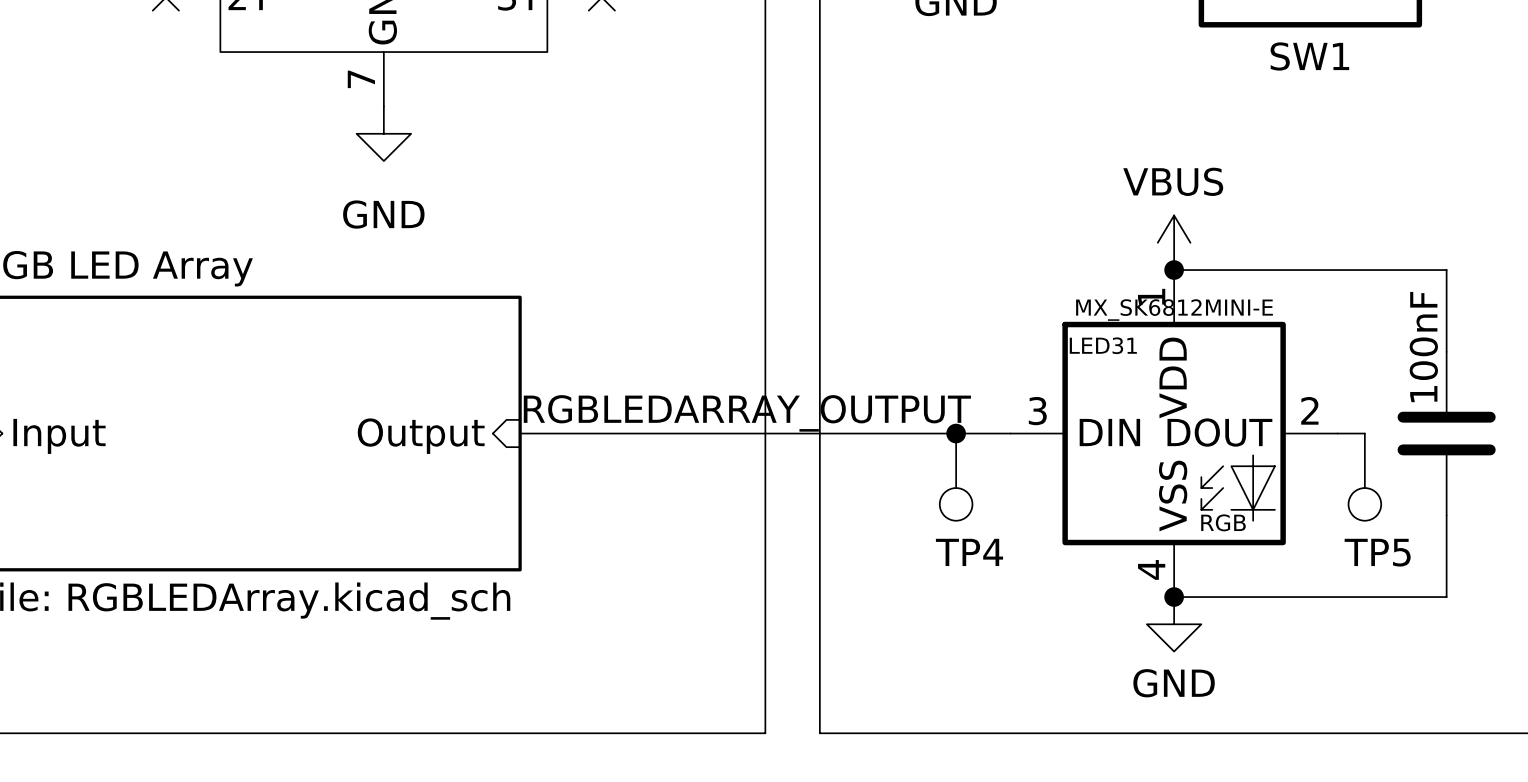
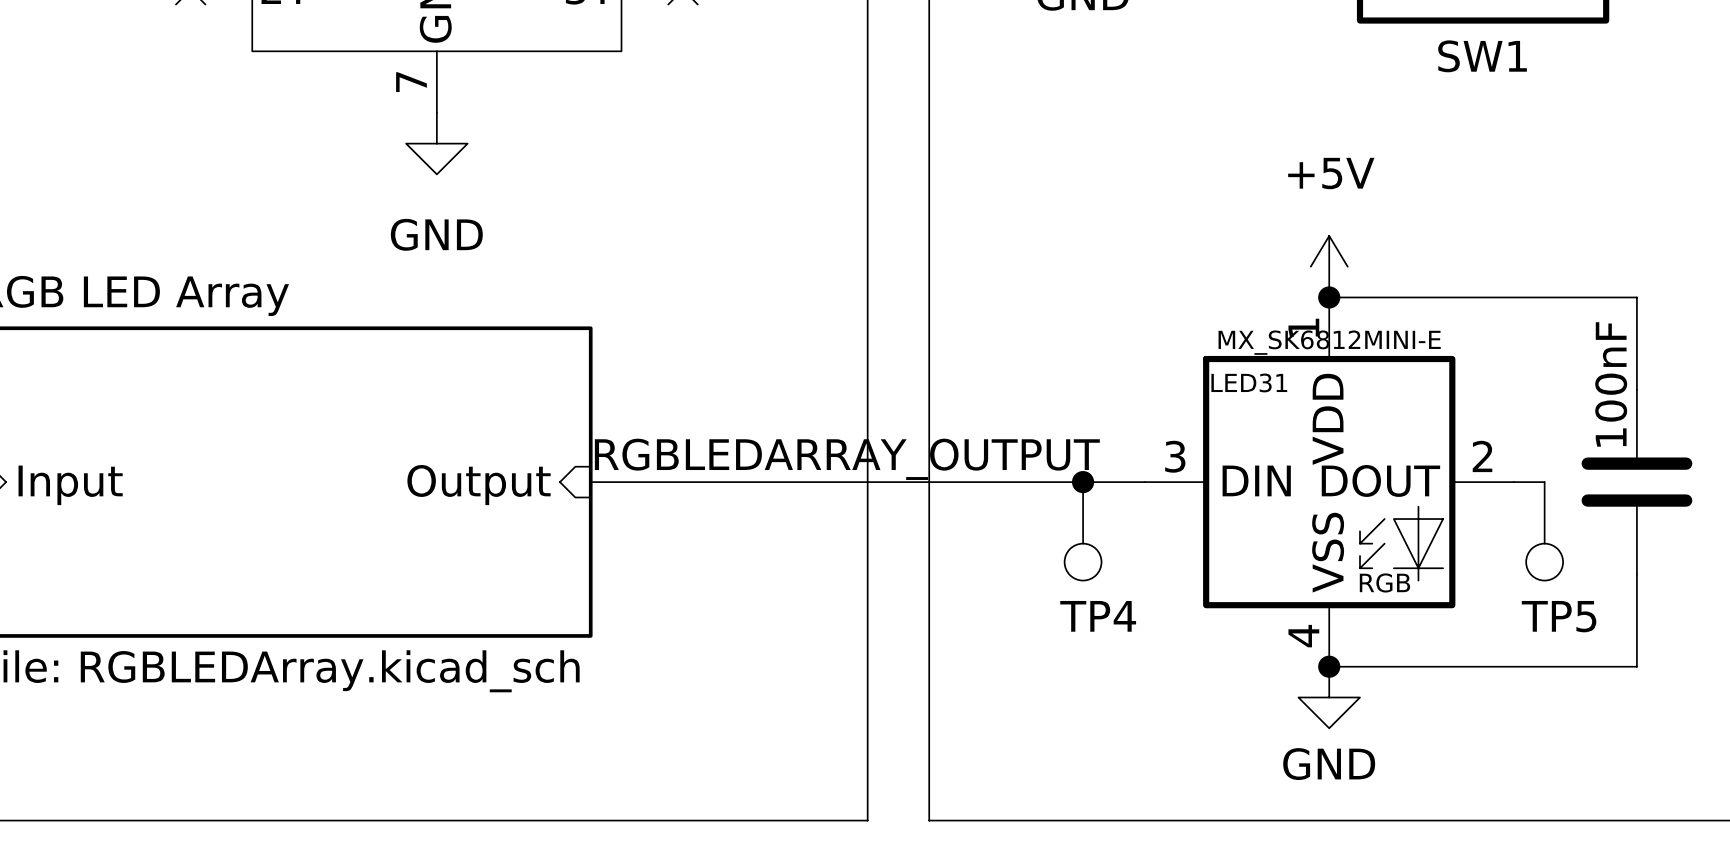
power symbol: VBUS (1174, 242) -> +5V (1329, 266)

